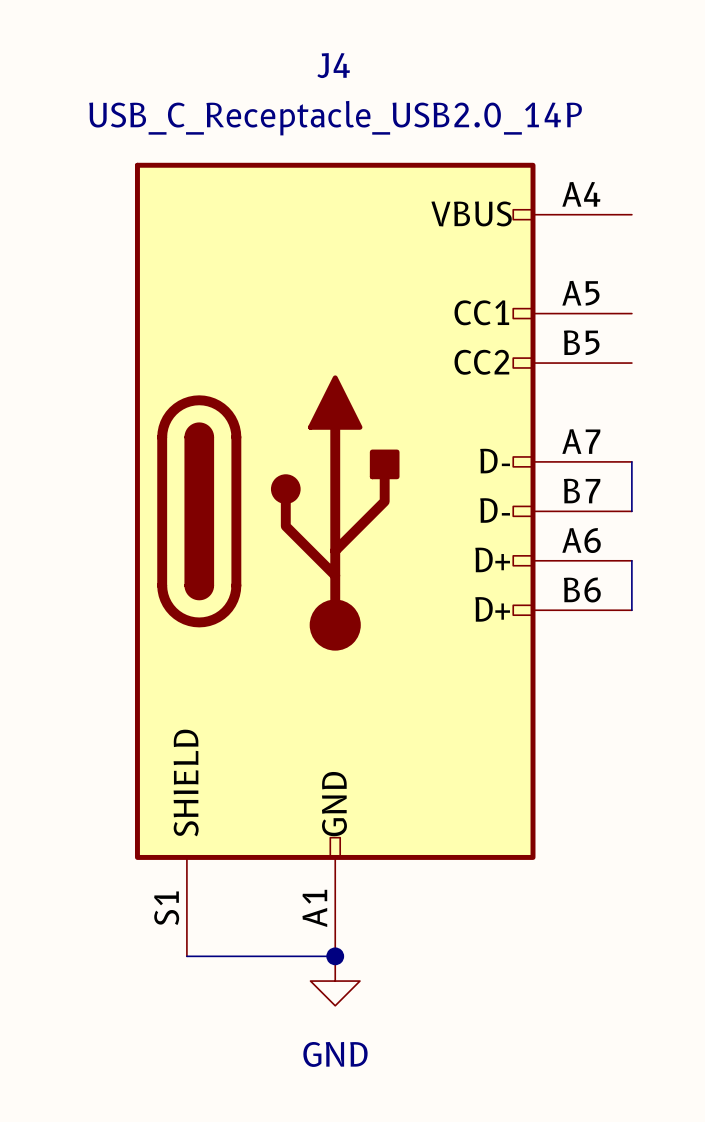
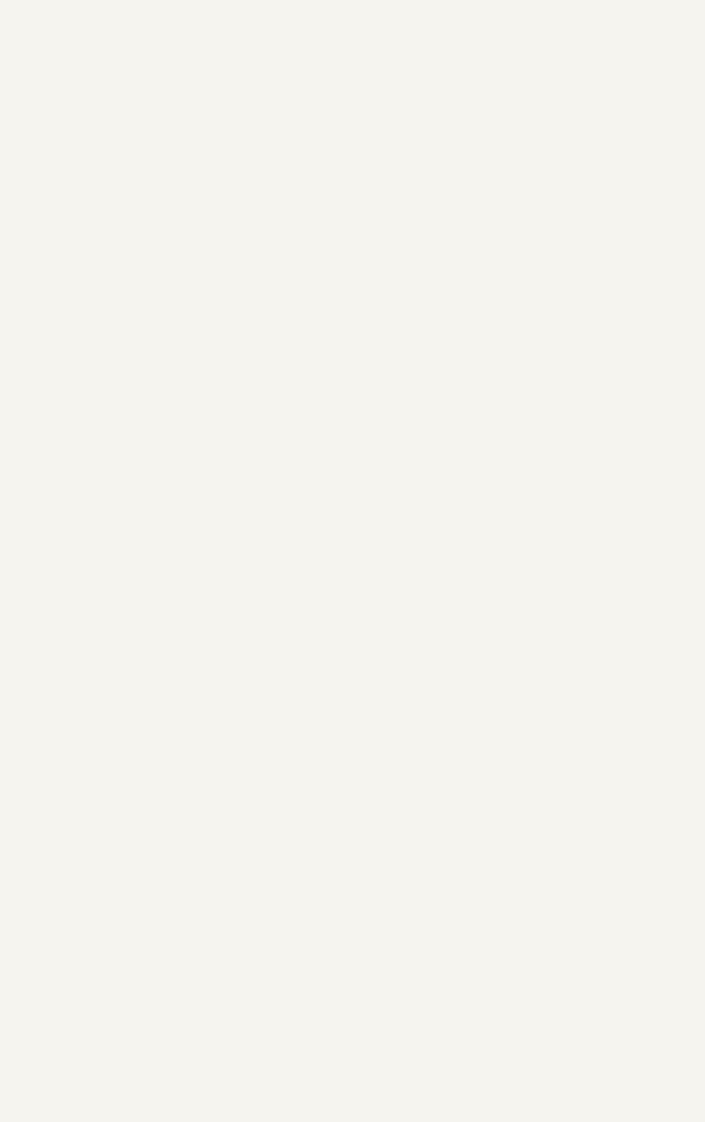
wire: (631, 461) (631, 511) -> none
J4: USB_C_Receptacle_USB2.0_14P (383, 559) -> none
wire: (631, 560) (631, 610) -> none
wire: (186, 956) (335, 956) -> none
junction: (335, 956) -> none
power symbol: GND (335, 981) -> none

